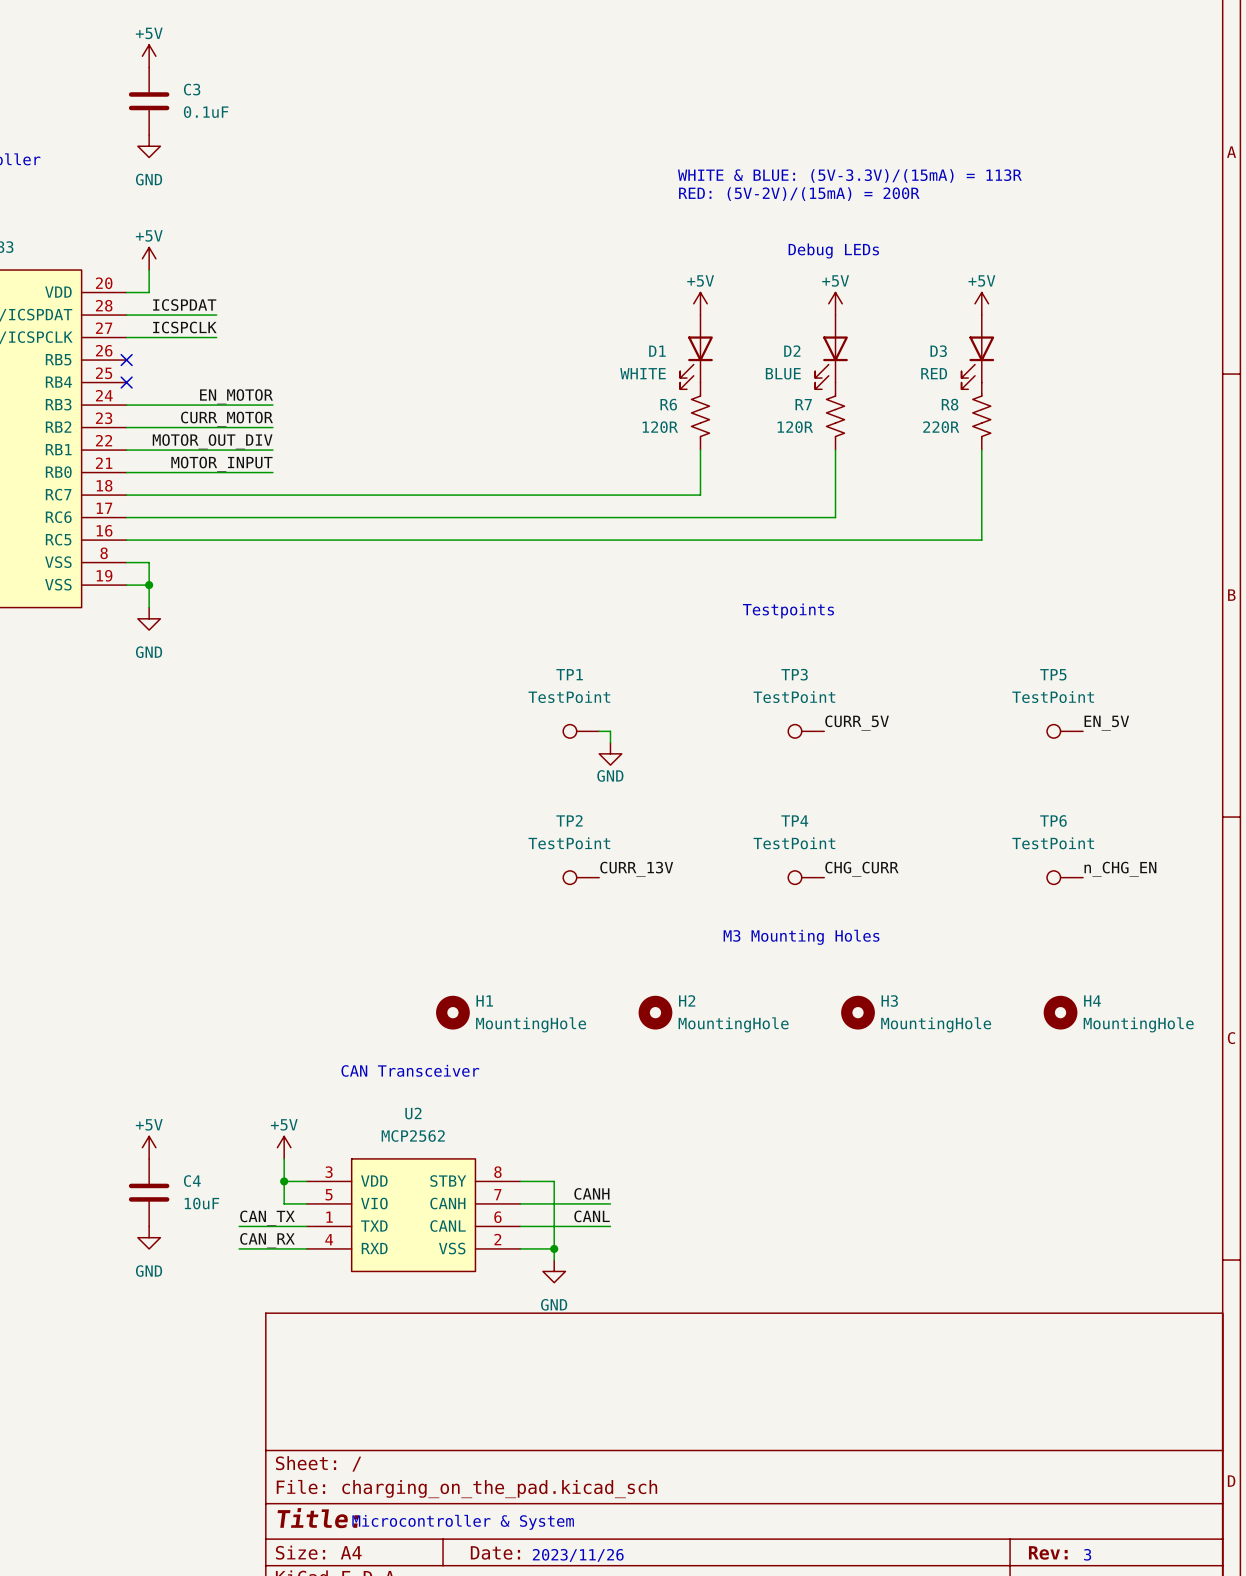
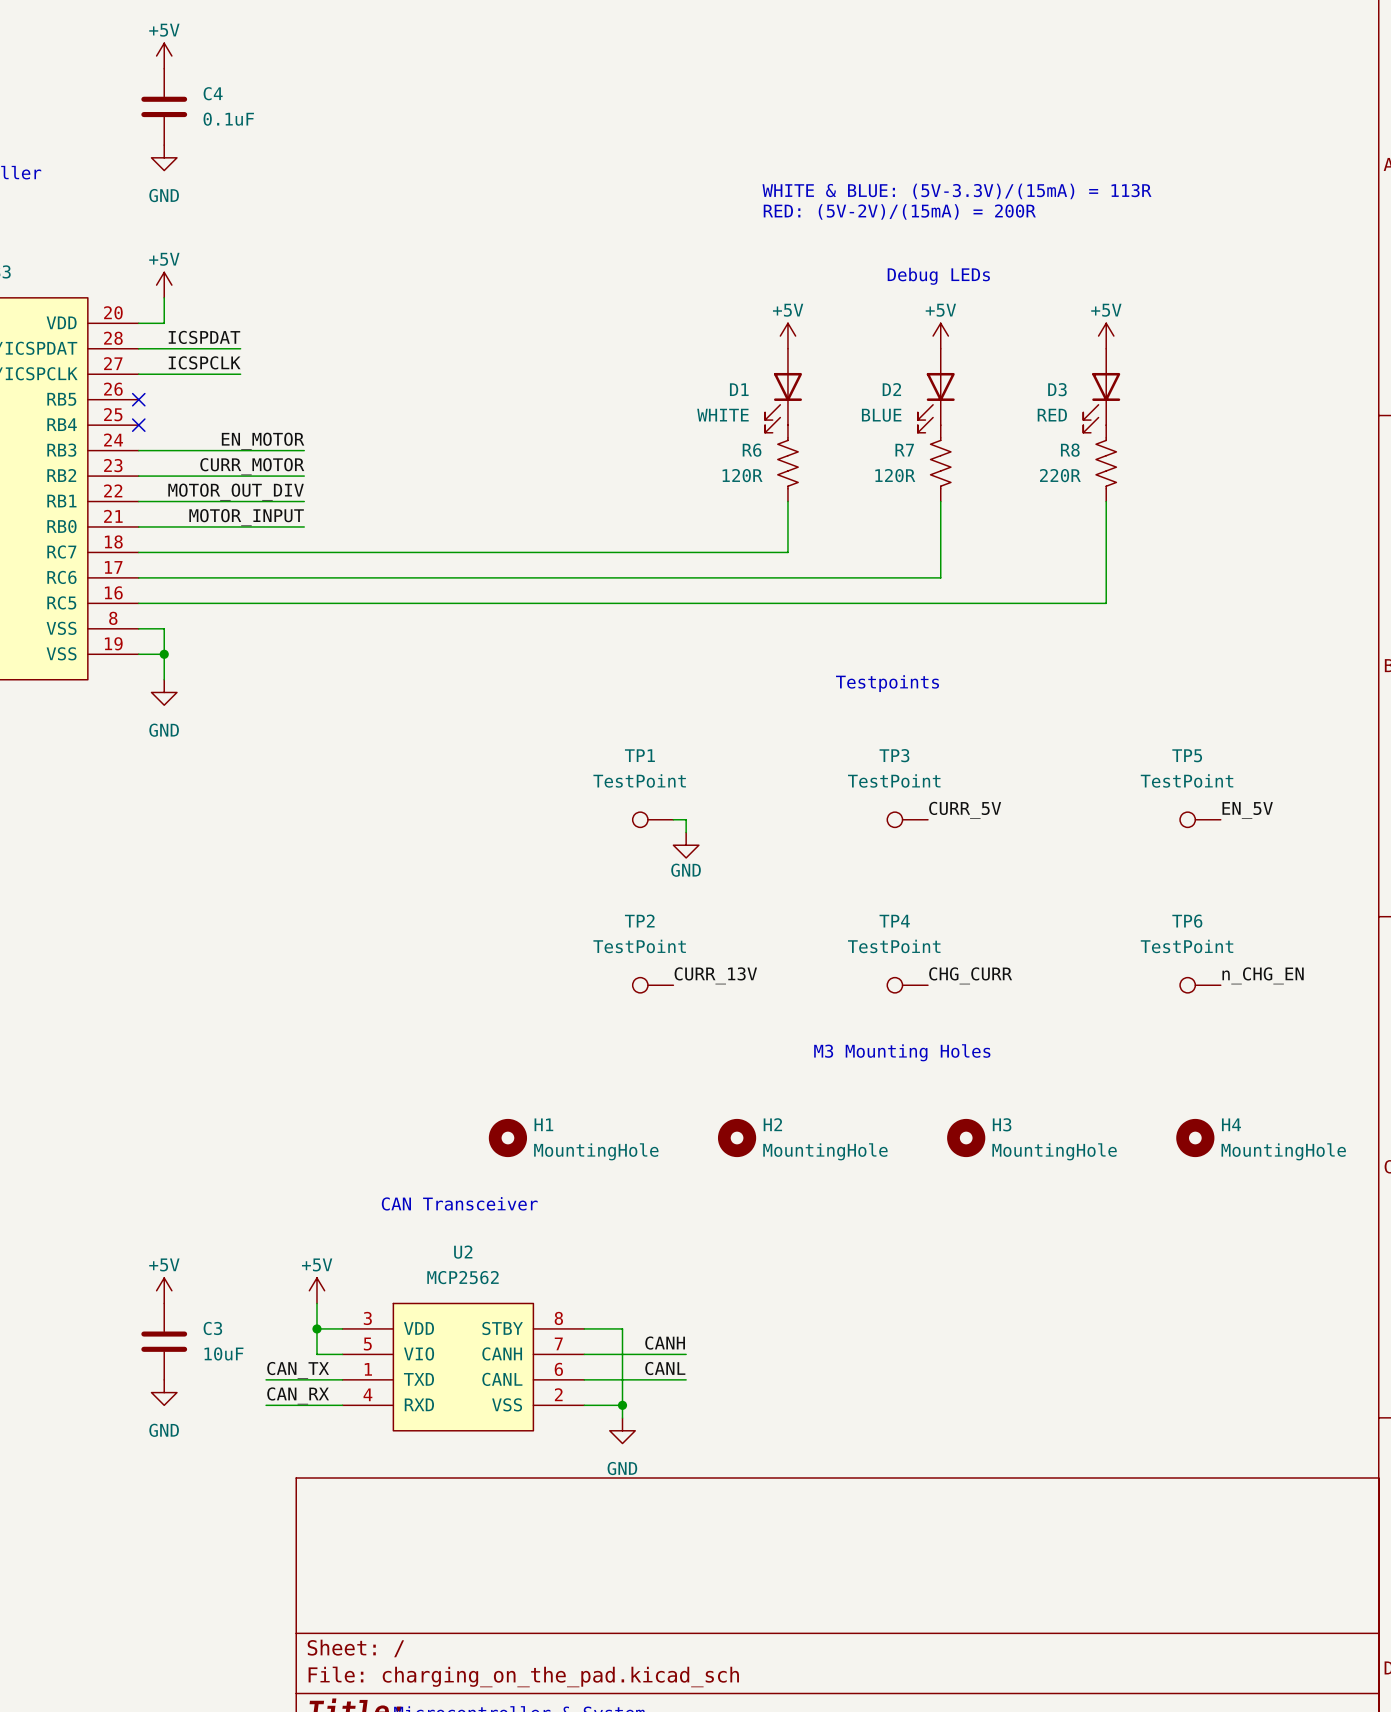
C3 name: C3 (192, 89) -> C4 (213, 93)
C4 name: C4 (192, 1181) -> C3 (212, 1328)

